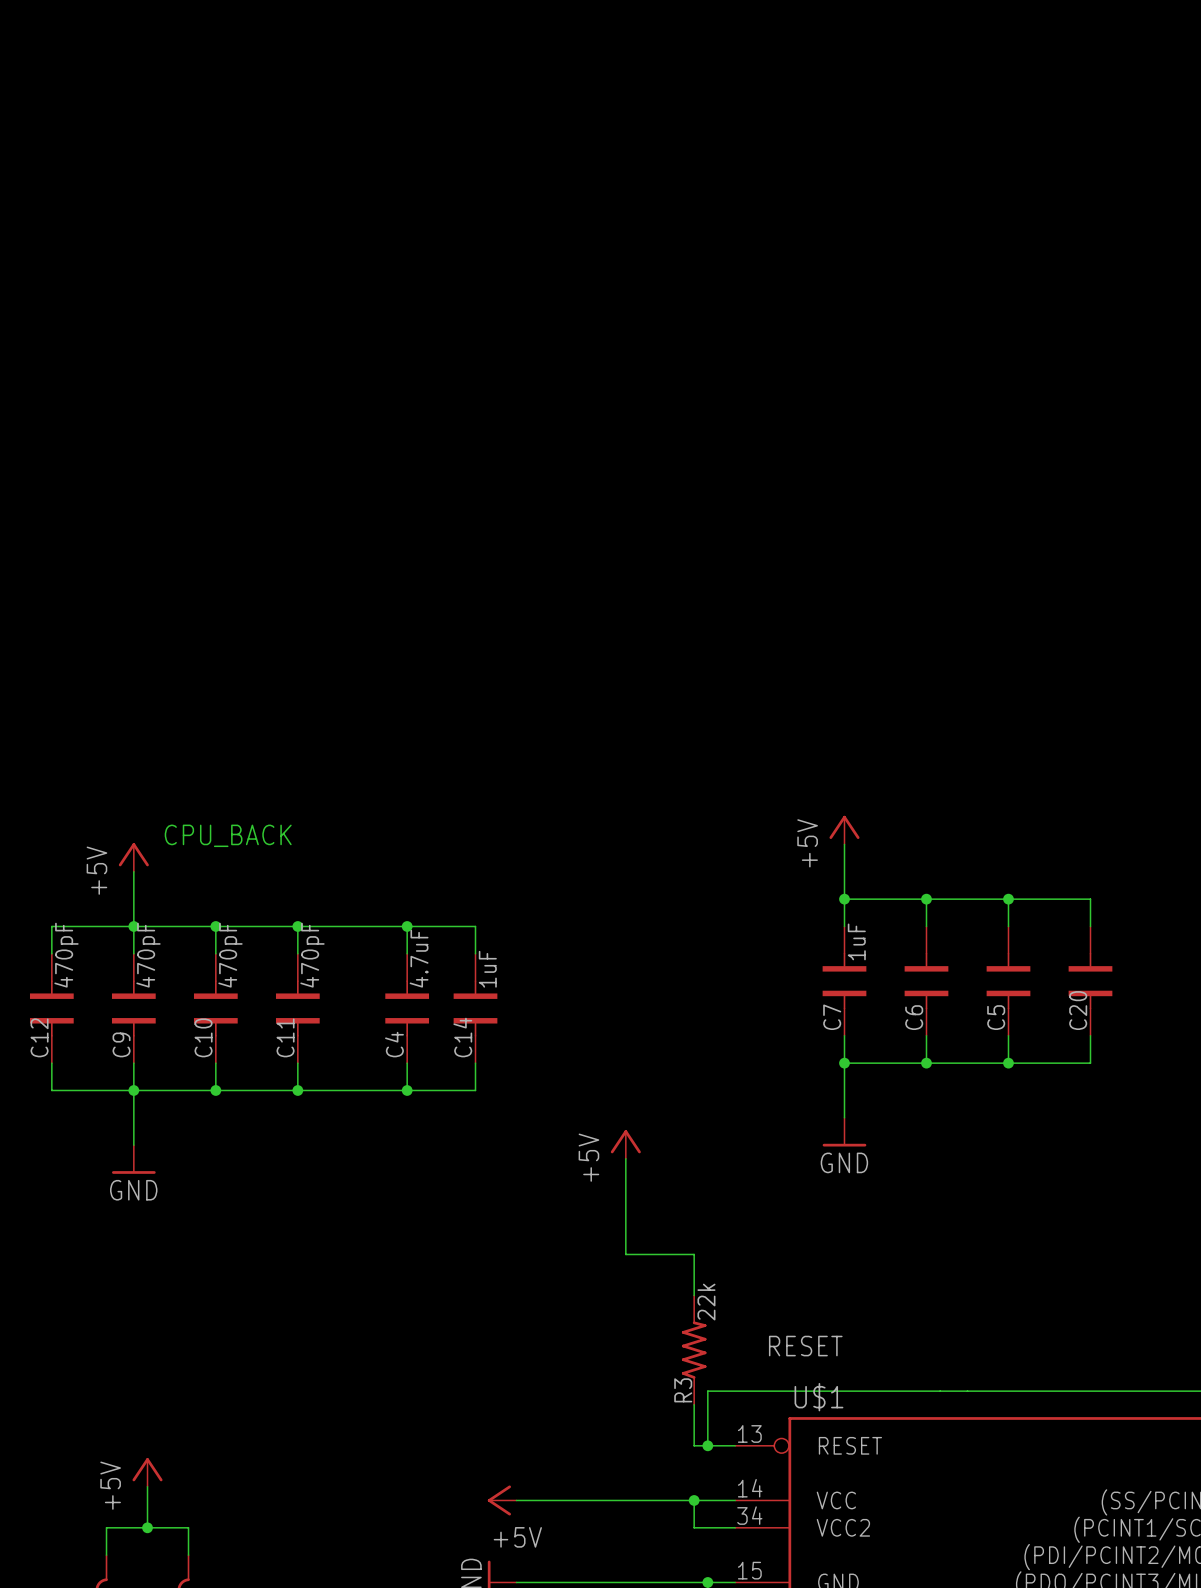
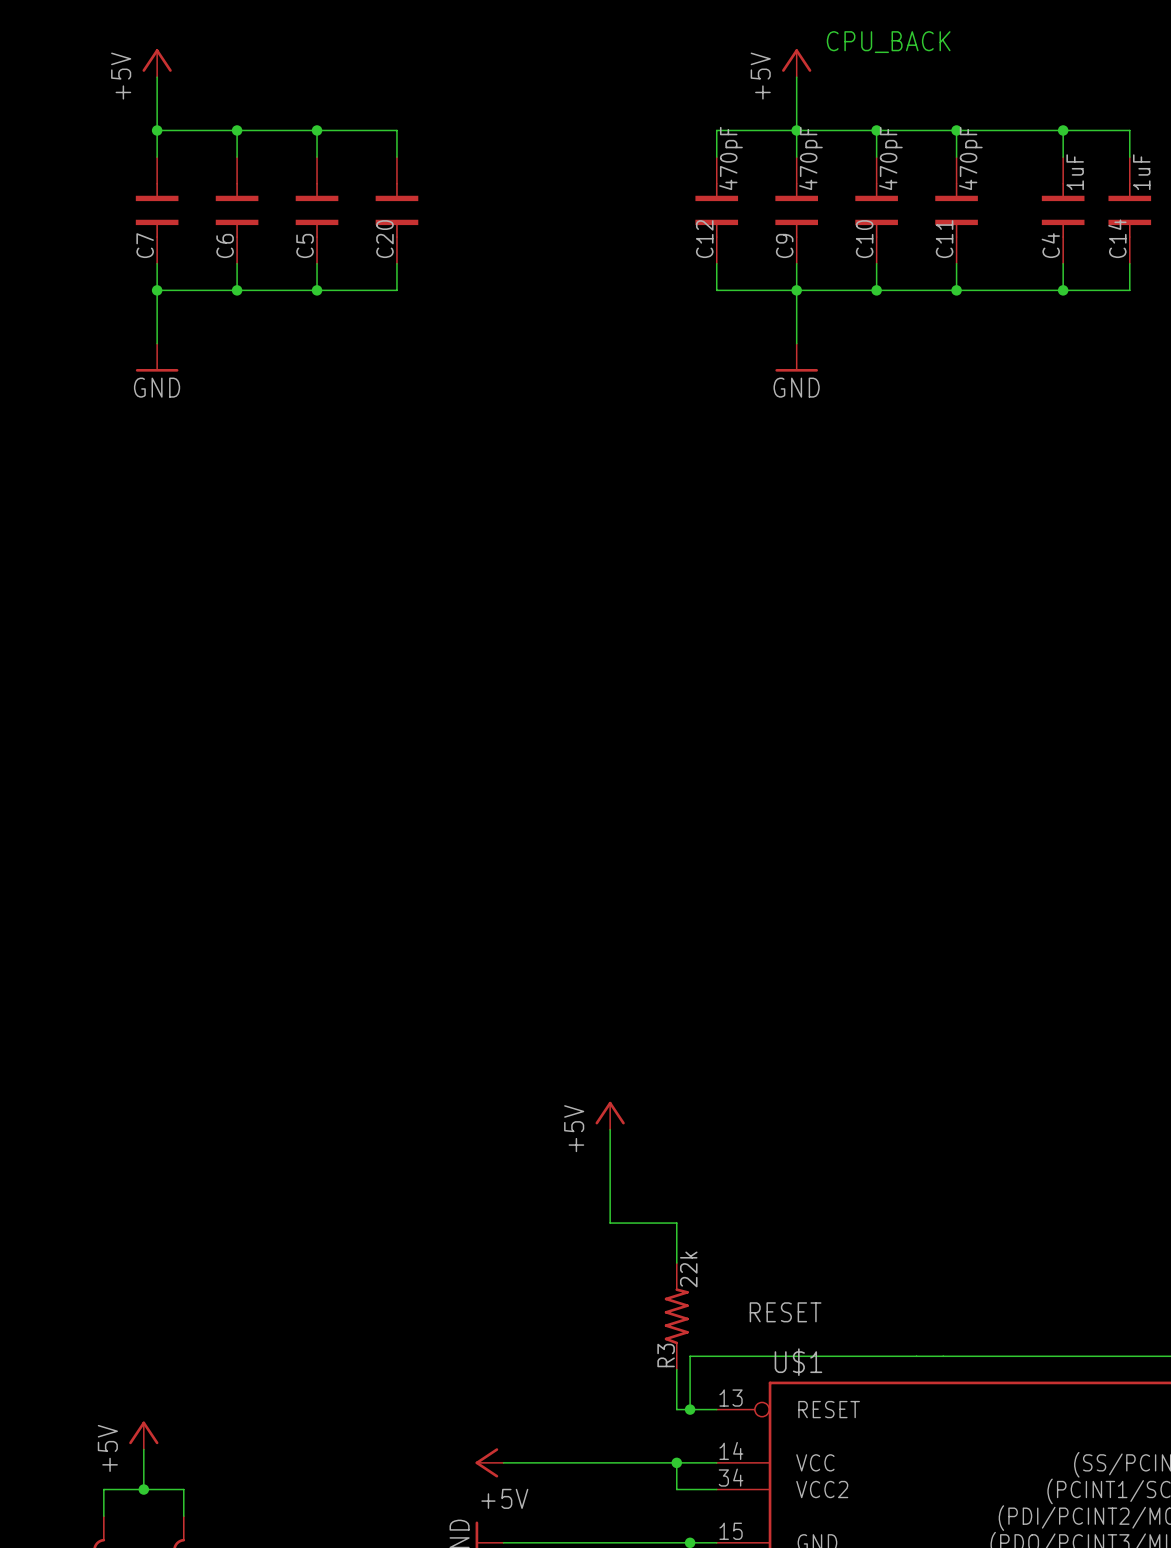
text: none -> CPU_BACK (888, 42)
power symbol: none -> +5V (157, 63)
power symbol: none -> +5V (796, 63)
wire: none -> (157, 77) (157, 157)
wire: none -> (796, 77) (796, 157)
wire: none -> (157, 130) (396, 130) (396, 157)
junction: none -> (157, 130)
wire: none -> (237, 130) (237, 157)
junction: none -> (237, 130)
wire: none -> (317, 130) (317, 157)
junction: none -> (317, 130)
junction: none -> (796, 130)
wire: none -> (876, 130) (876, 157)
junction: none -> (876, 130)
wire: none -> (956, 130) (956, 157)
junction: none -> (956, 130)
wire: none -> (1063, 130) (1063, 157)
junction: none -> (1063, 130)
wire: none -> (716, 157) (716, 130) (1129, 130) (1129, 157)
wire: none -> (157, 263) (157, 343)
wire: none -> (237, 263) (237, 290)
wire: none -> (317, 263) (317, 290)
wire: none -> (396, 263) (396, 290) (157, 290)
wire: none -> (716, 263) (716, 290) (1129, 290) (1129, 263)
wire: none -> (796, 263) (796, 343)
wire: none -> (876, 263) (876, 290)
wire: none -> (956, 263) (956, 290)
wire: none -> (1063, 263) (1063, 290)
junction: none -> (157, 290)
junction: none -> (237, 290)
junction: none -> (317, 290)
junction: none -> (796, 290)
junction: none -> (876, 290)
junction: none -> (956, 290)
junction: none -> (1063, 290)
power symbol: none -> GND (157, 357)
power symbol: none -> GND (796, 357)
power symbol: +5V (844, 830) -> none
text: CPU_BACK (228, 835) -> none
wire: (844, 844) (844, 926) -> none
power symbol: +5V (133, 857) -> none
wire: (133, 871) (133, 953) -> none
wire: (844, 899) (1090, 899) (1090, 926) -> none
junction: (844, 899) -> none
wire: (926, 899) (926, 926) -> none
junction: (926, 899) -> none
wire: (1008, 899) (1008, 926) -> none
junction: (1008, 899) -> none
junction: (133, 926) -> none
wire: (215, 926) (215, 953) -> none
junction: (215, 926) -> none
wire: (297, 926) (297, 953) -> none
junction: (297, 926) -> none
wire: (407, 926) (407, 953) -> none
junction: (407, 926) -> none
C7 value: 1uF (856, 941) -> none
wire: (51, 953) (51, 926) (475, 926) (475, 953) -> none
C4 value: 4.7uF (419, 958) -> 1uF (1075, 172)
C7 position: (844, 981) -> (157, 210)
C6 position: (926, 981) -> (237, 210)
C5 position: (1008, 981) -> (317, 210)
C20 position: (1090, 981) -> (396, 210)
C12 position: (51, 1008) -> (716, 210)
C9 position: (133, 1008) -> (796, 210)
C10 position: (215, 1008) -> (876, 210)
C11 position: (297, 1008) -> (956, 210)
C4 position: (407, 1008) -> (1063, 210)
C14 position: (475, 1008) -> (1129, 210)
wire: (844, 1035) (844, 1117) -> none
wire: (926, 1035) (926, 1063) -> none
wire: (1008, 1035) (1008, 1063) -> none
wire: (1090, 1035) (1090, 1063) (844, 1063) -> none
wire: (51, 1063) (51, 1090) (475, 1090) (475, 1063) -> none
wire: (133, 1063) (133, 1145) -> none
wire: (215, 1063) (215, 1090) -> none
wire: (297, 1063) (297, 1090) -> none
wire: (407, 1063) (407, 1090) -> none
junction: (844, 1063) -> none
junction: (926, 1063) -> none
junction: (1008, 1063) -> none
junction: (133, 1090) -> none
junction: (215, 1090) -> none
junction: (297, 1090) -> none
junction: (407, 1090) -> none
power symbol: GND (844, 1132) -> none
power symbol: GND (133, 1159) -> none

